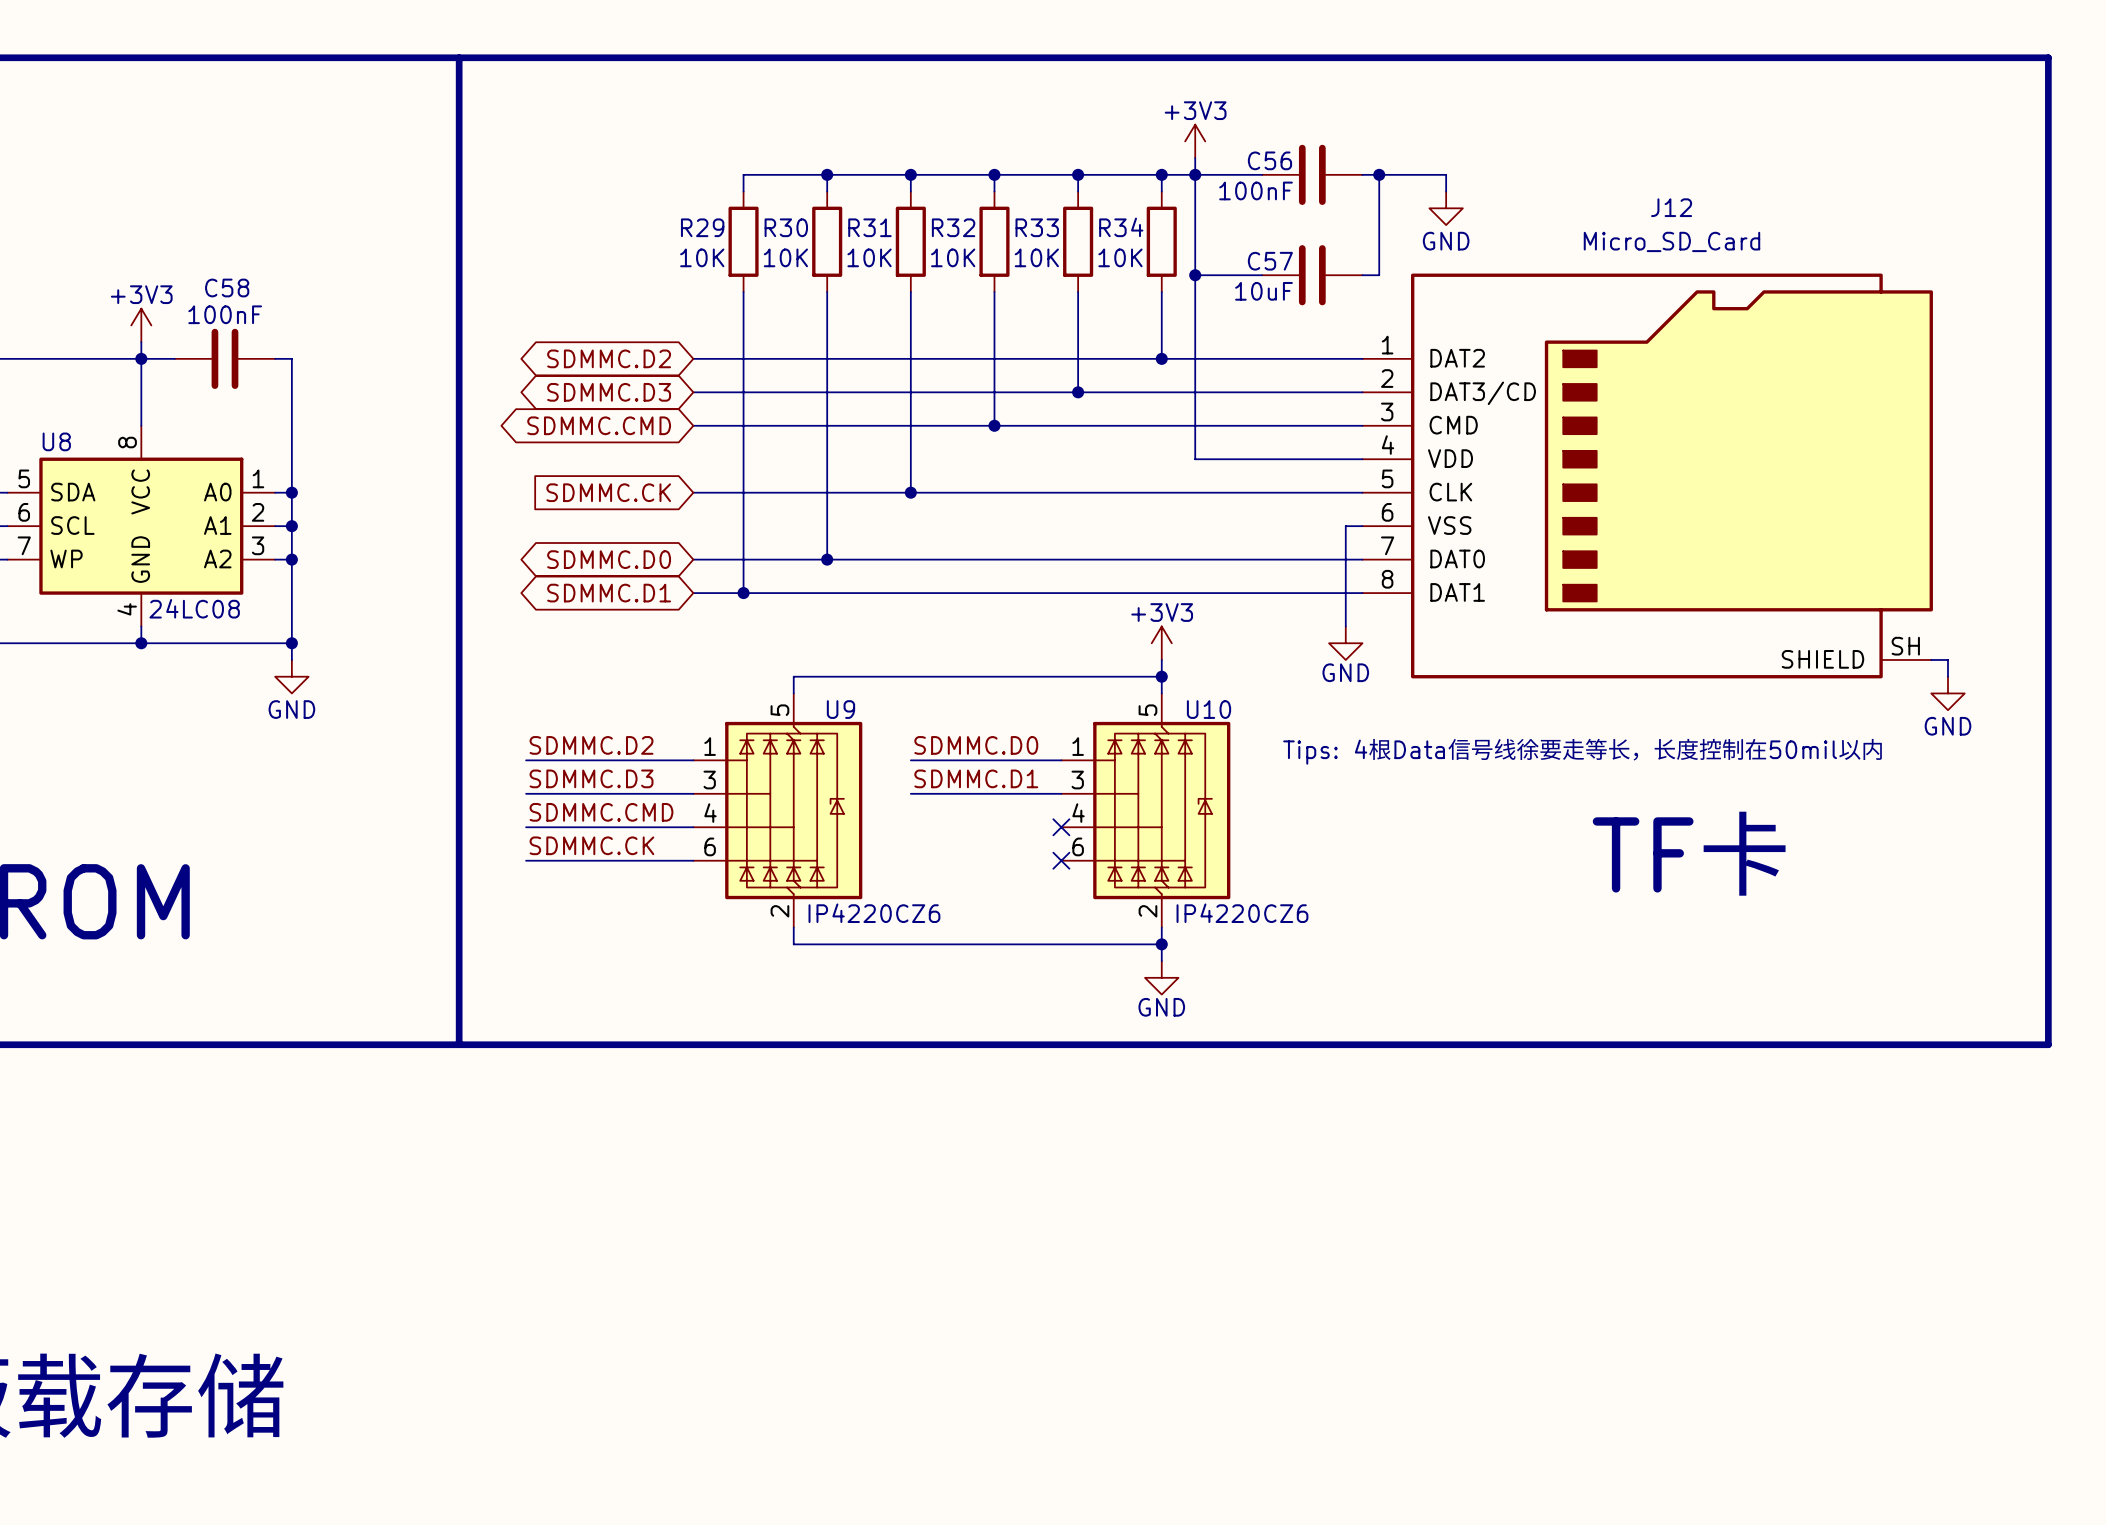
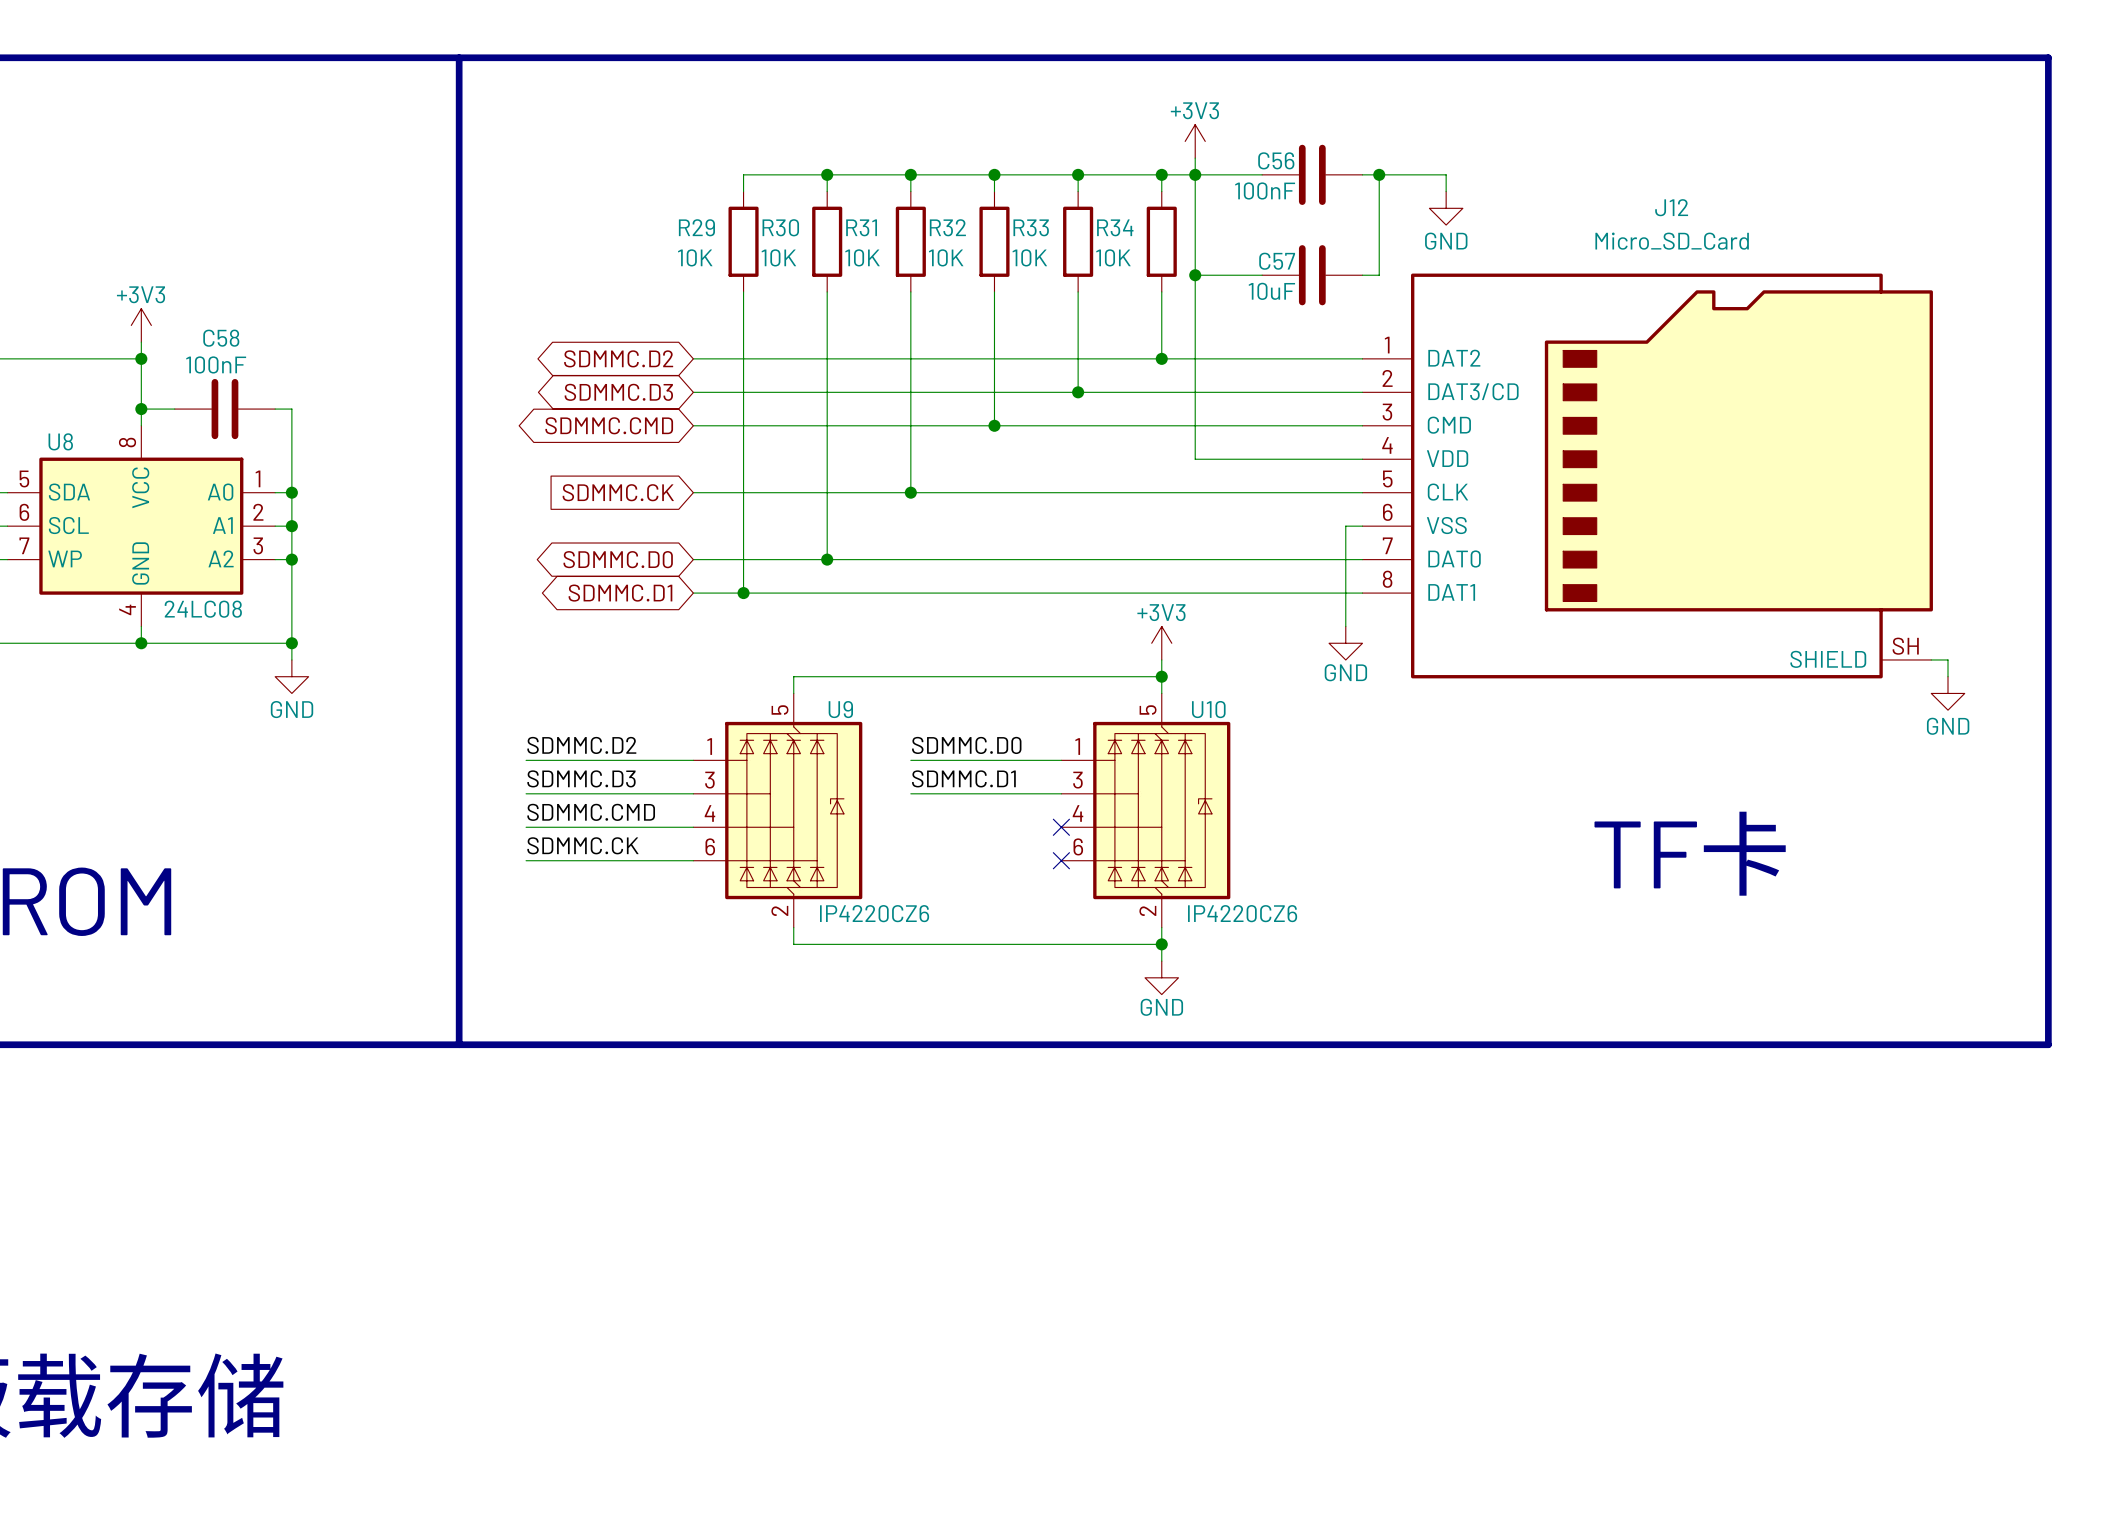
wire: (141, 358) (174, 358) -> (141, 409) (174, 409)
C58 position: (224, 358) -> (224, 409)
wire: (275, 358) (291, 358) (291, 409) -> (275, 409) (291, 409)
junction: none -> (141, 409)
text: Tips: 4根Data信号线徐要走等长，长度控制在50mil以内 (1583, 751) -> none

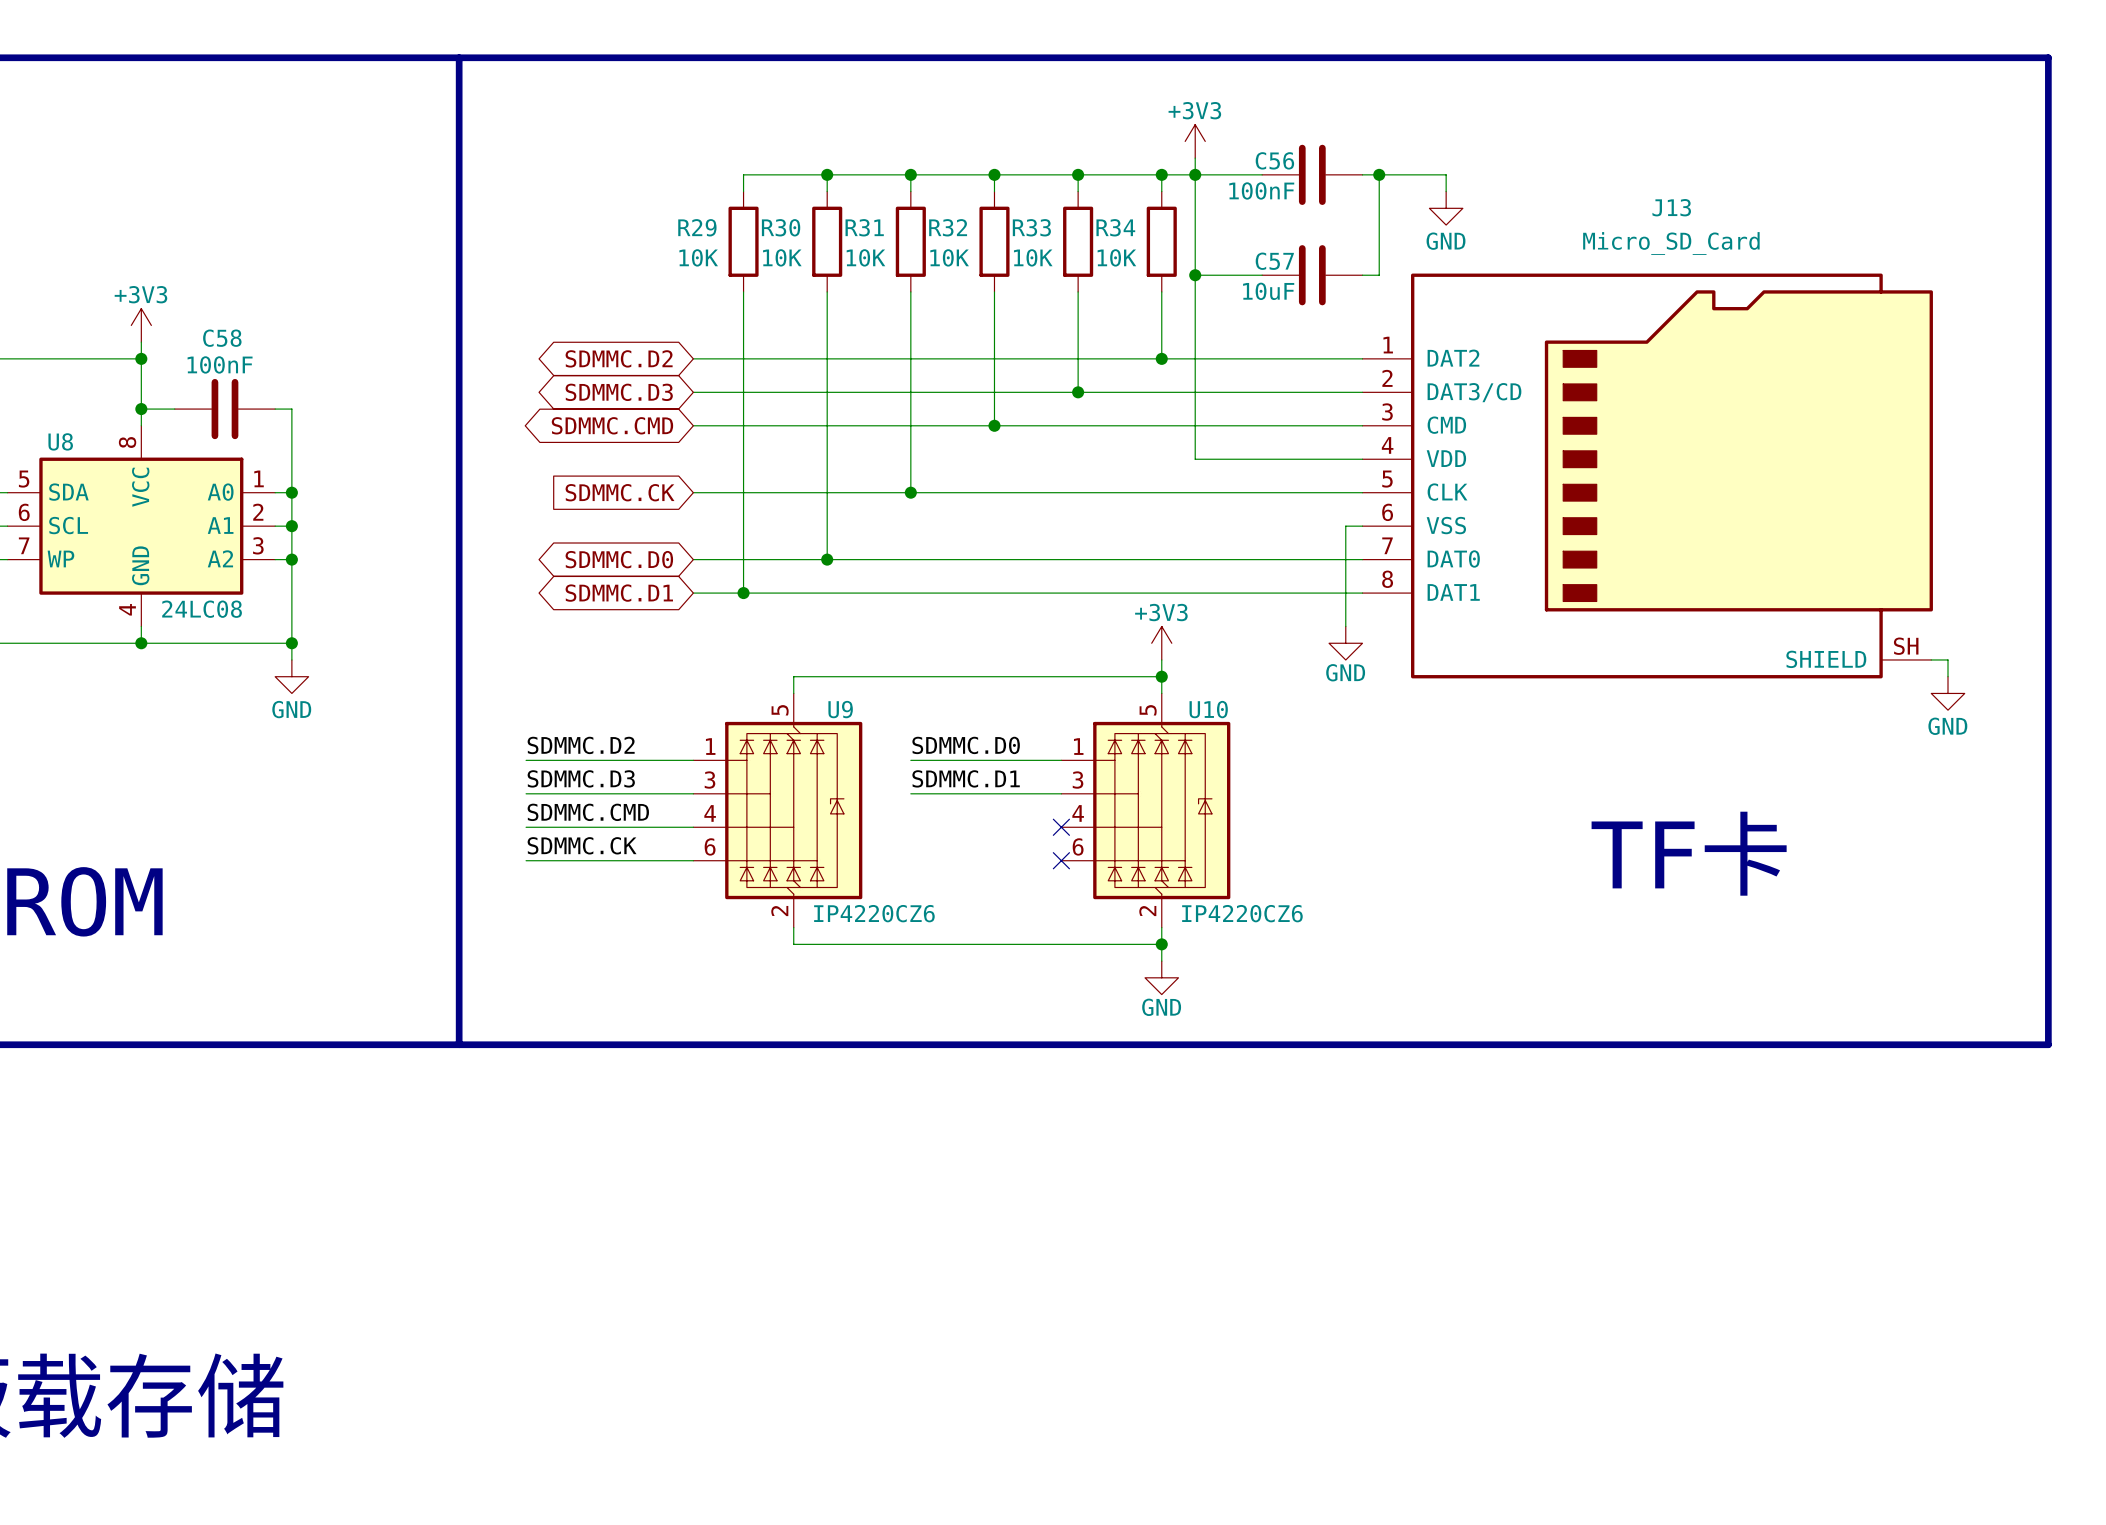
J12 name: J12 (1671, 207) -> J13 (1671, 207)

